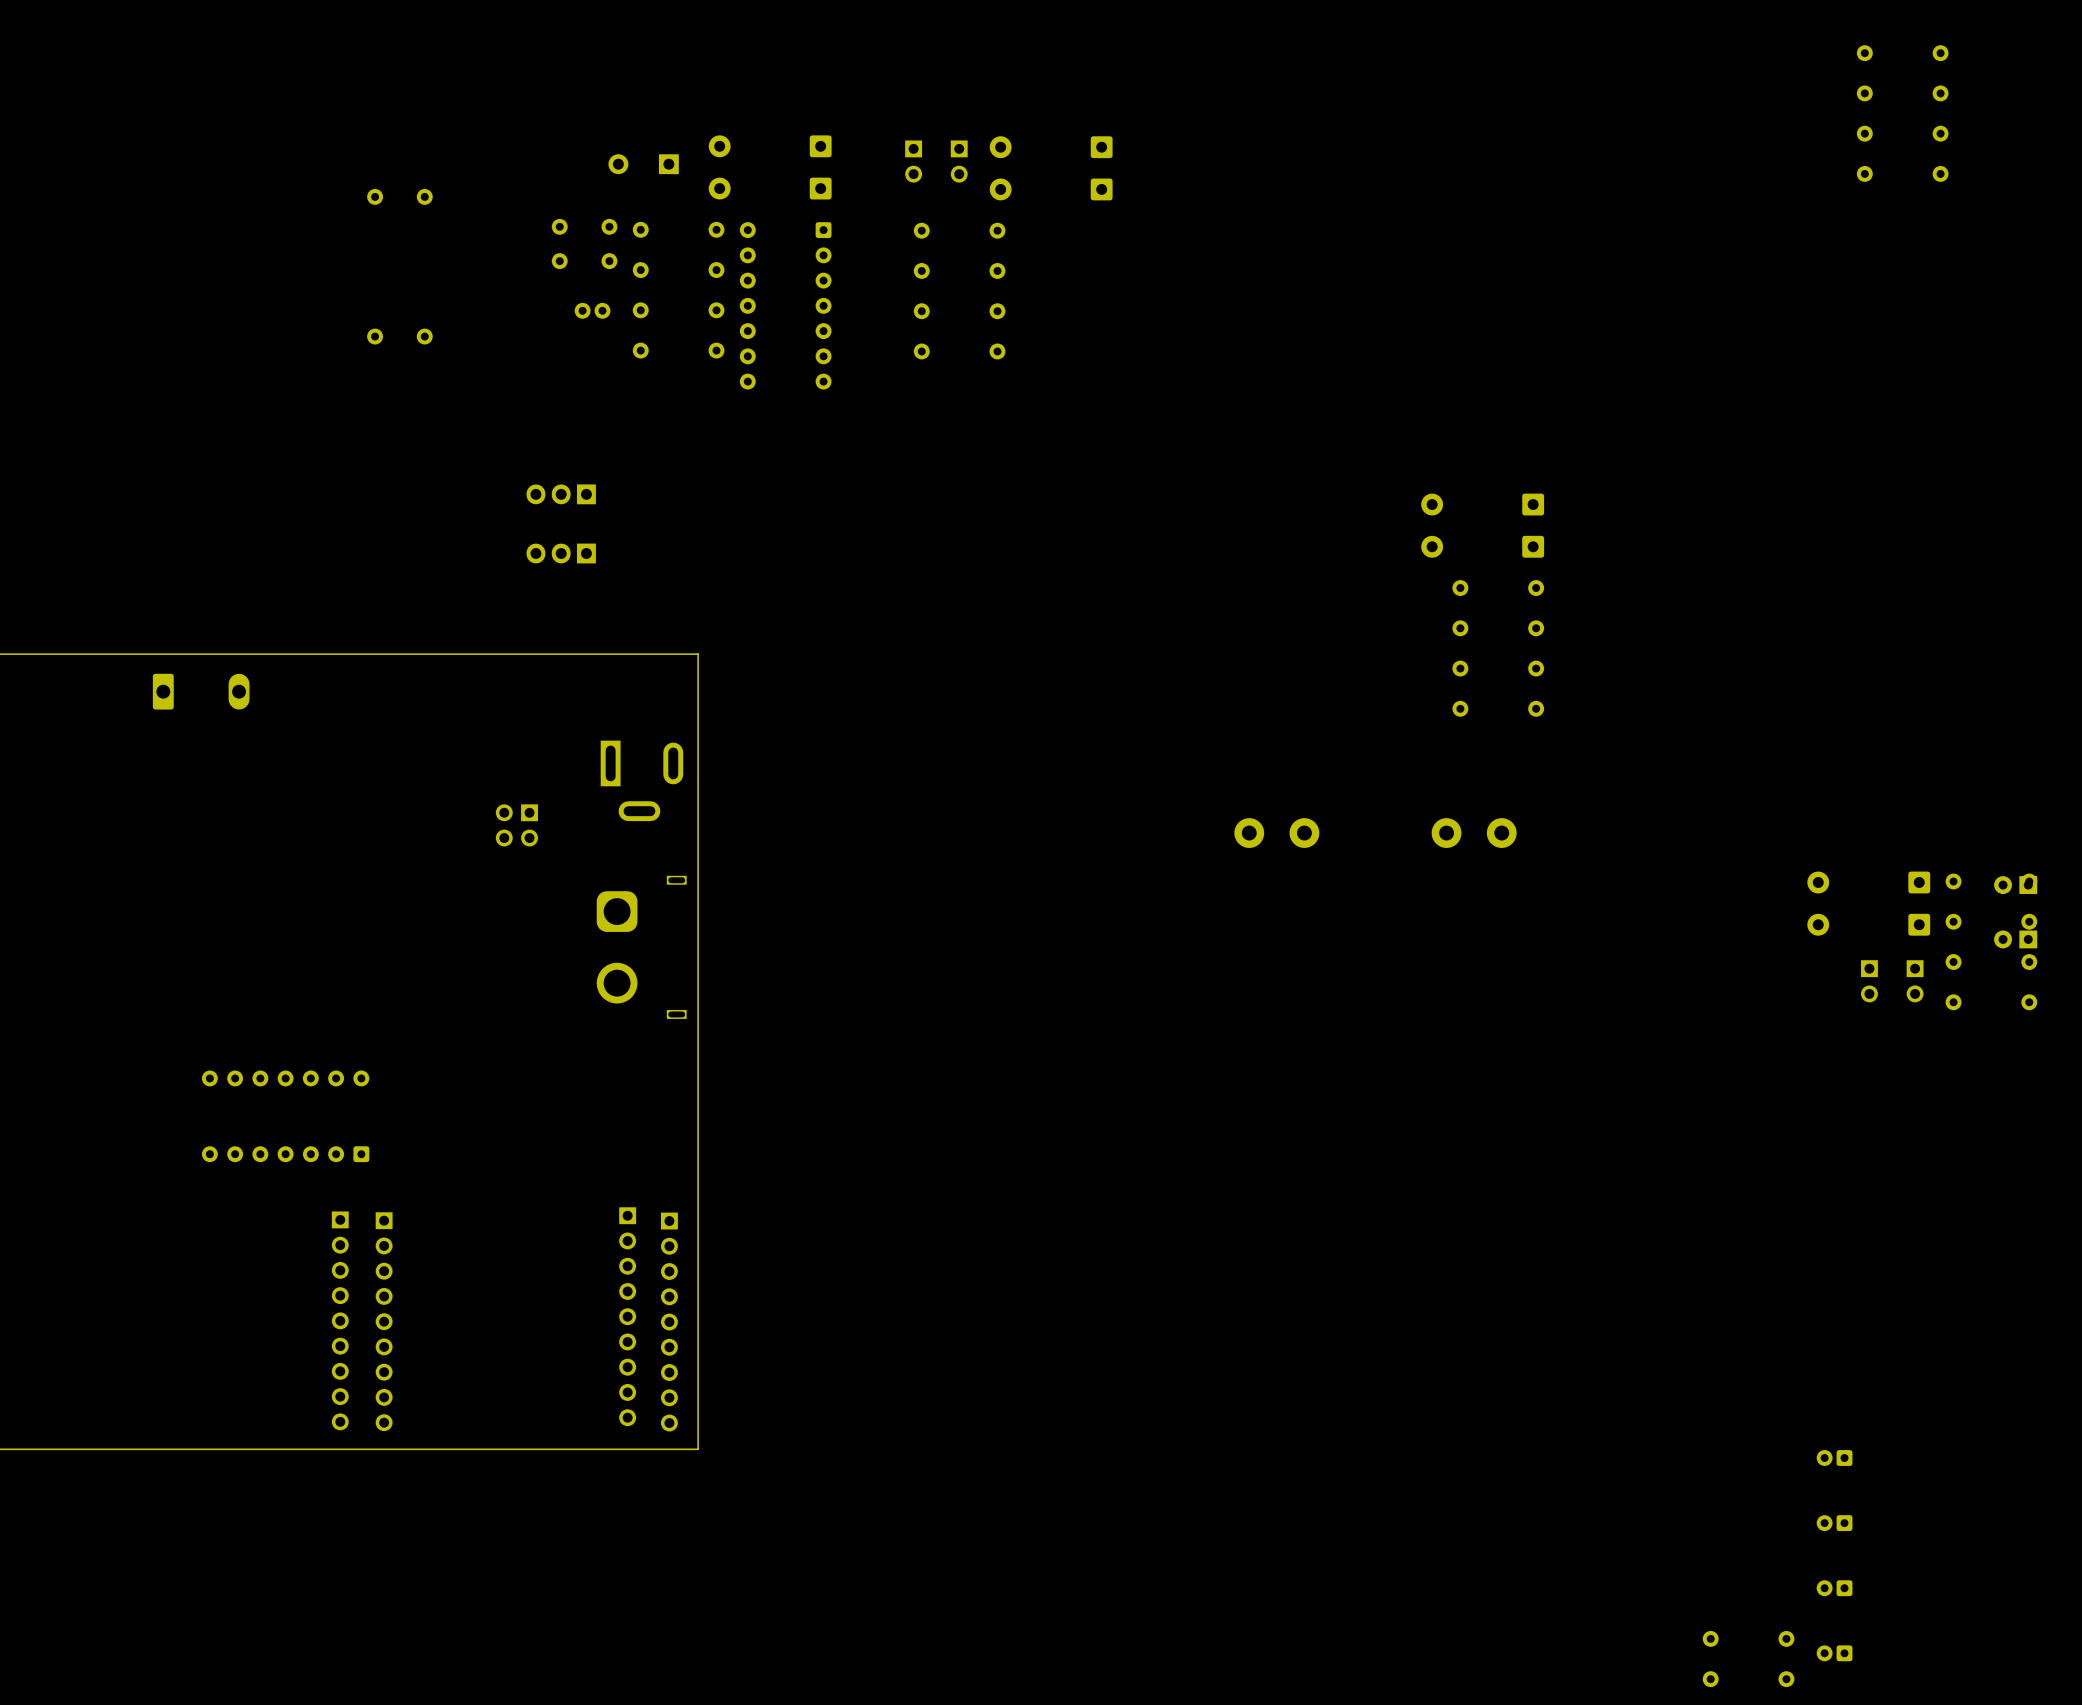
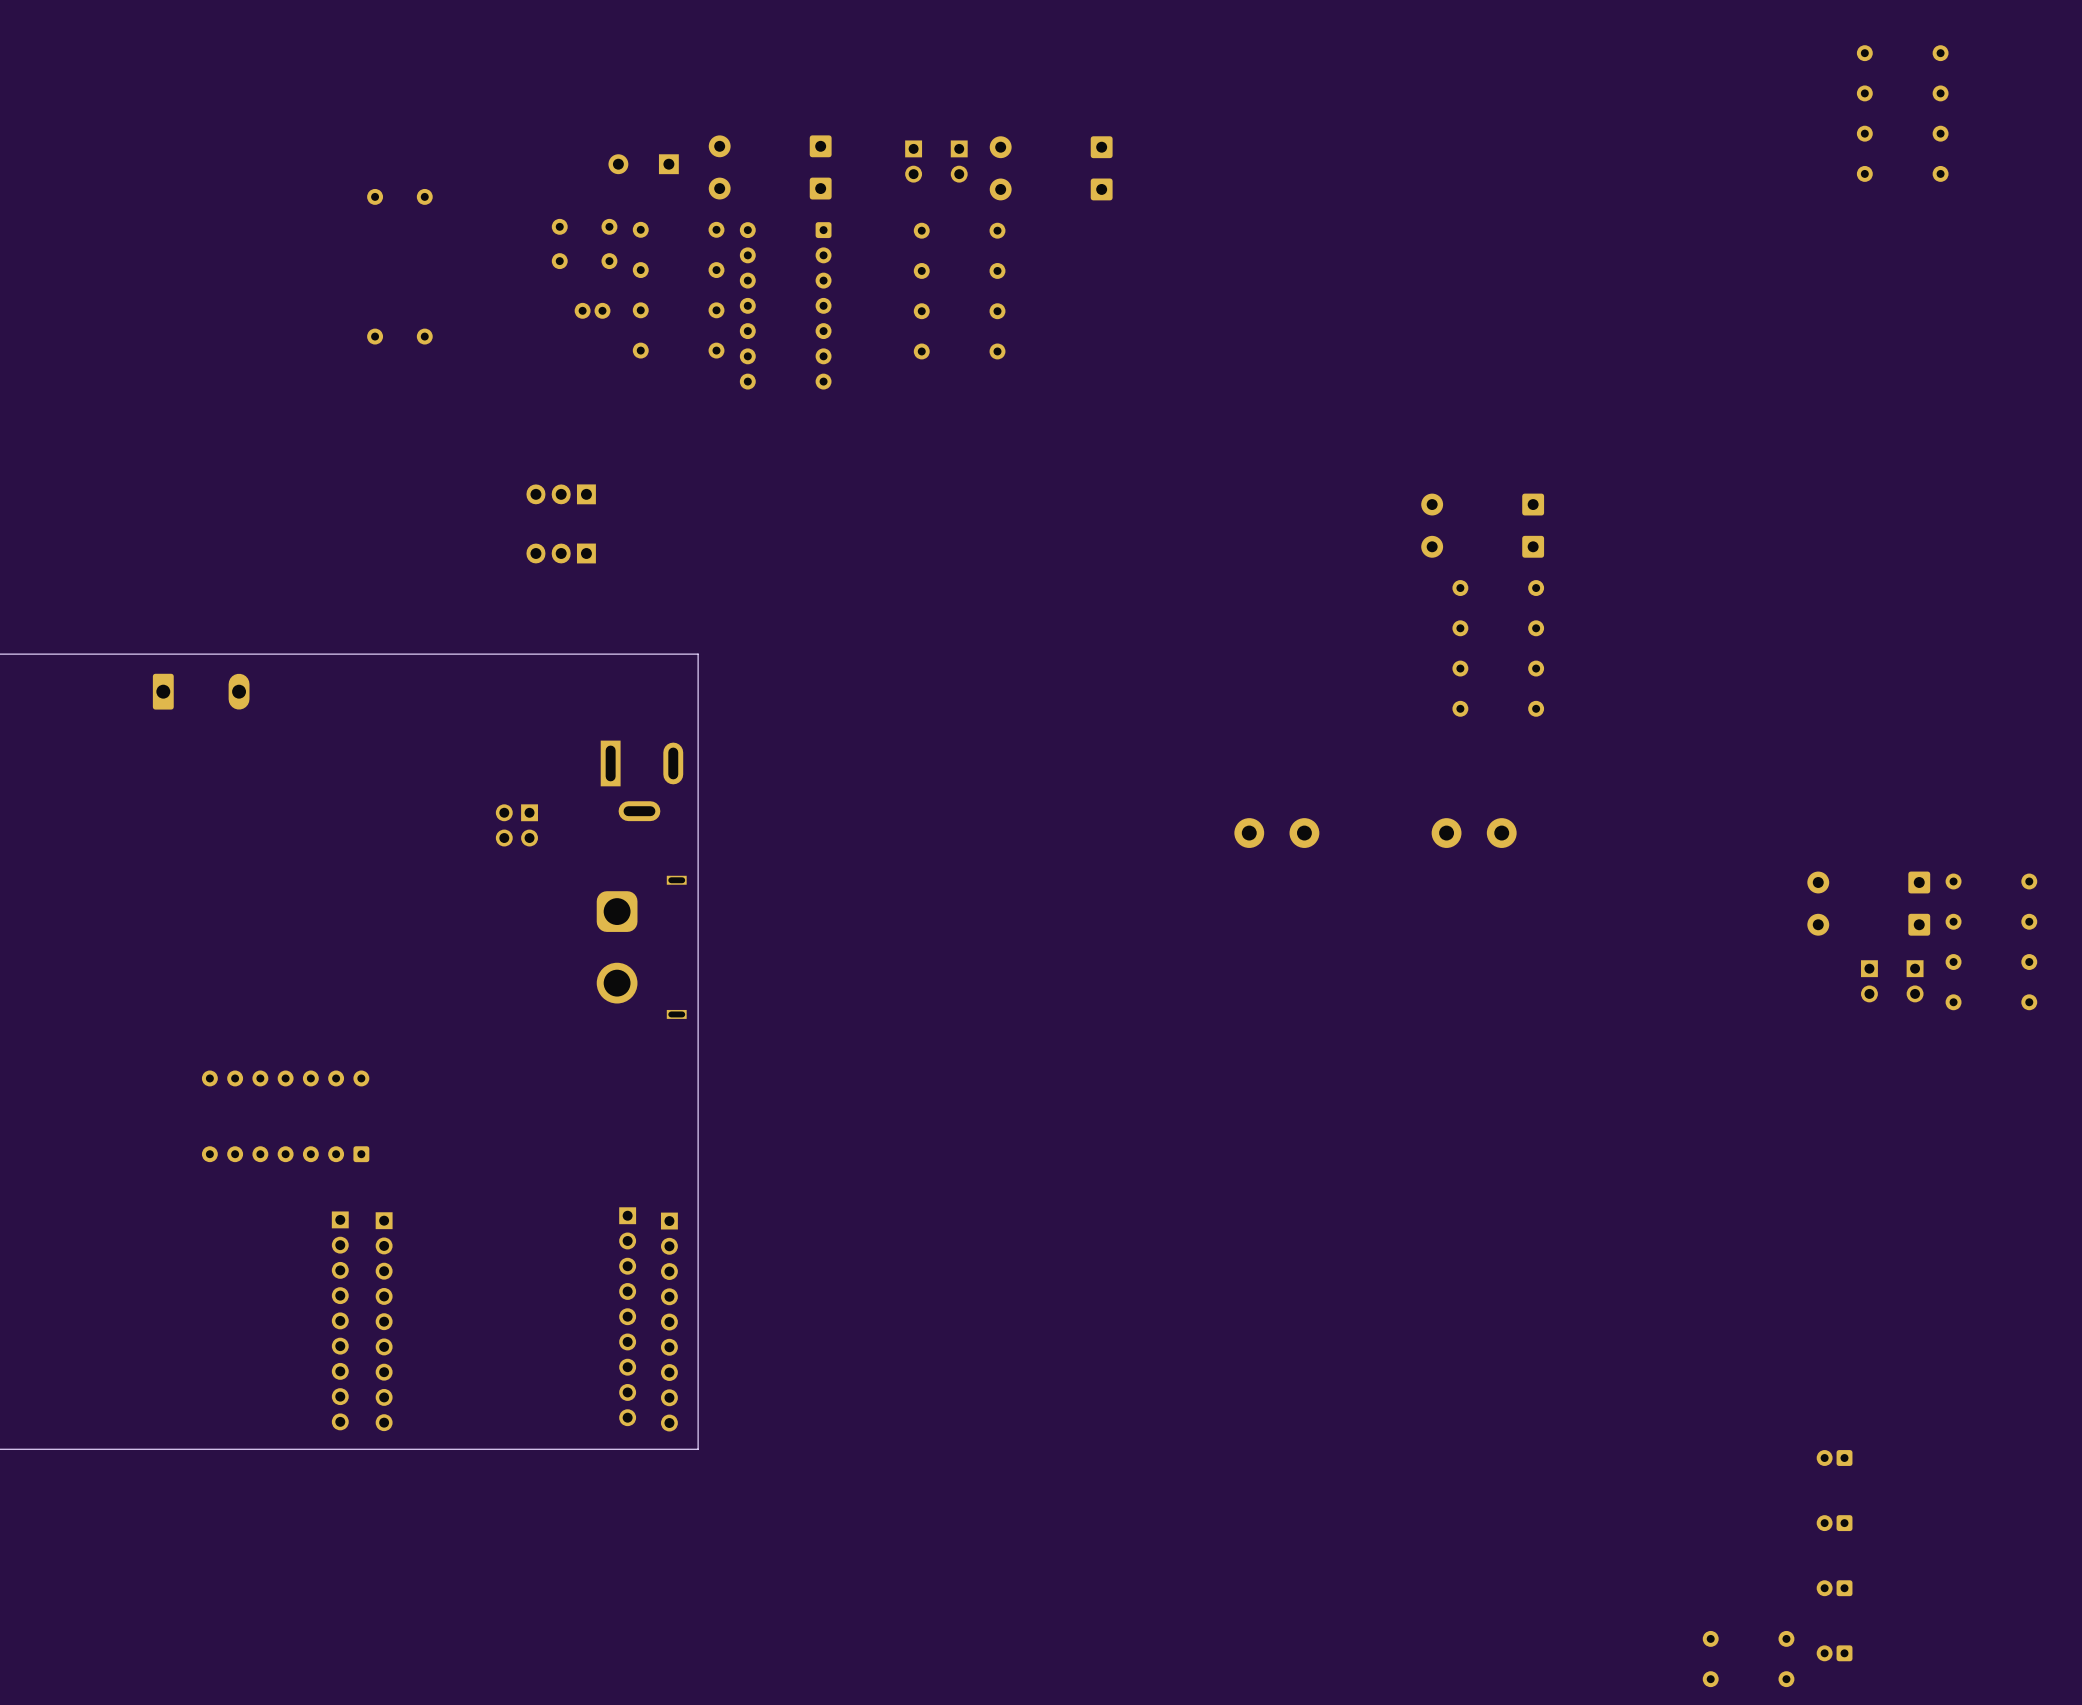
part: (2015, 885) -> none
part: (2015, 939) -> none

